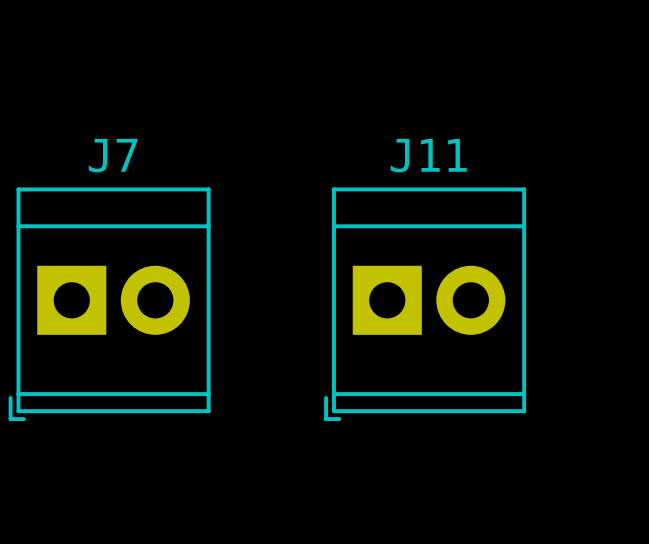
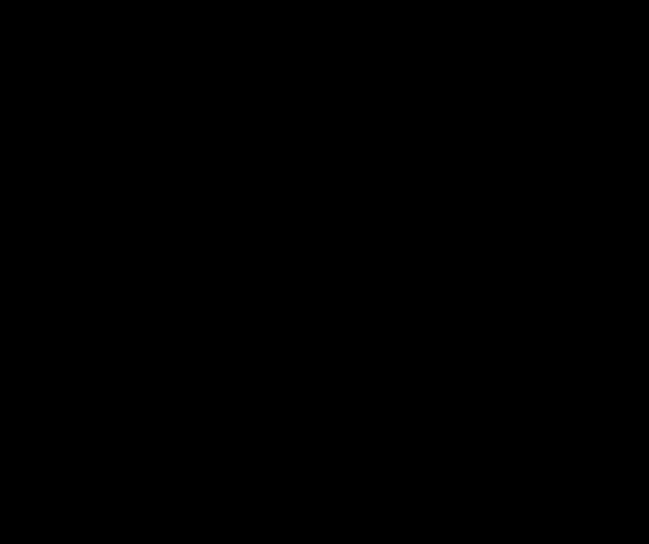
J7: (109, 304) -> none
J11: (425, 304) -> none

